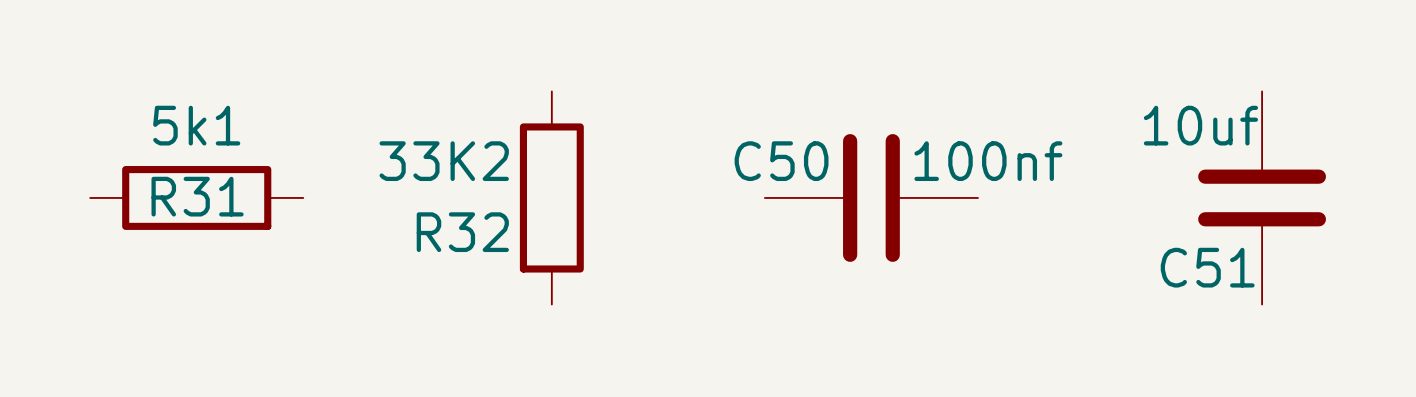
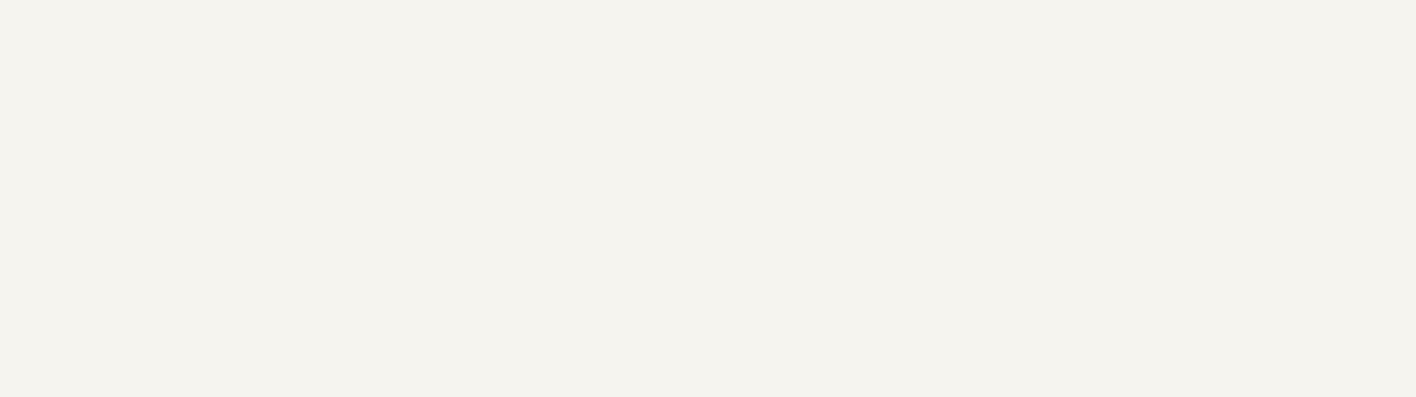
R31: 5k1 (196, 197) -> none
R32: 33K2 (551, 197) -> none
C50: 100nf (871, 197) -> none
C51: 10uf (1262, 197) -> none

